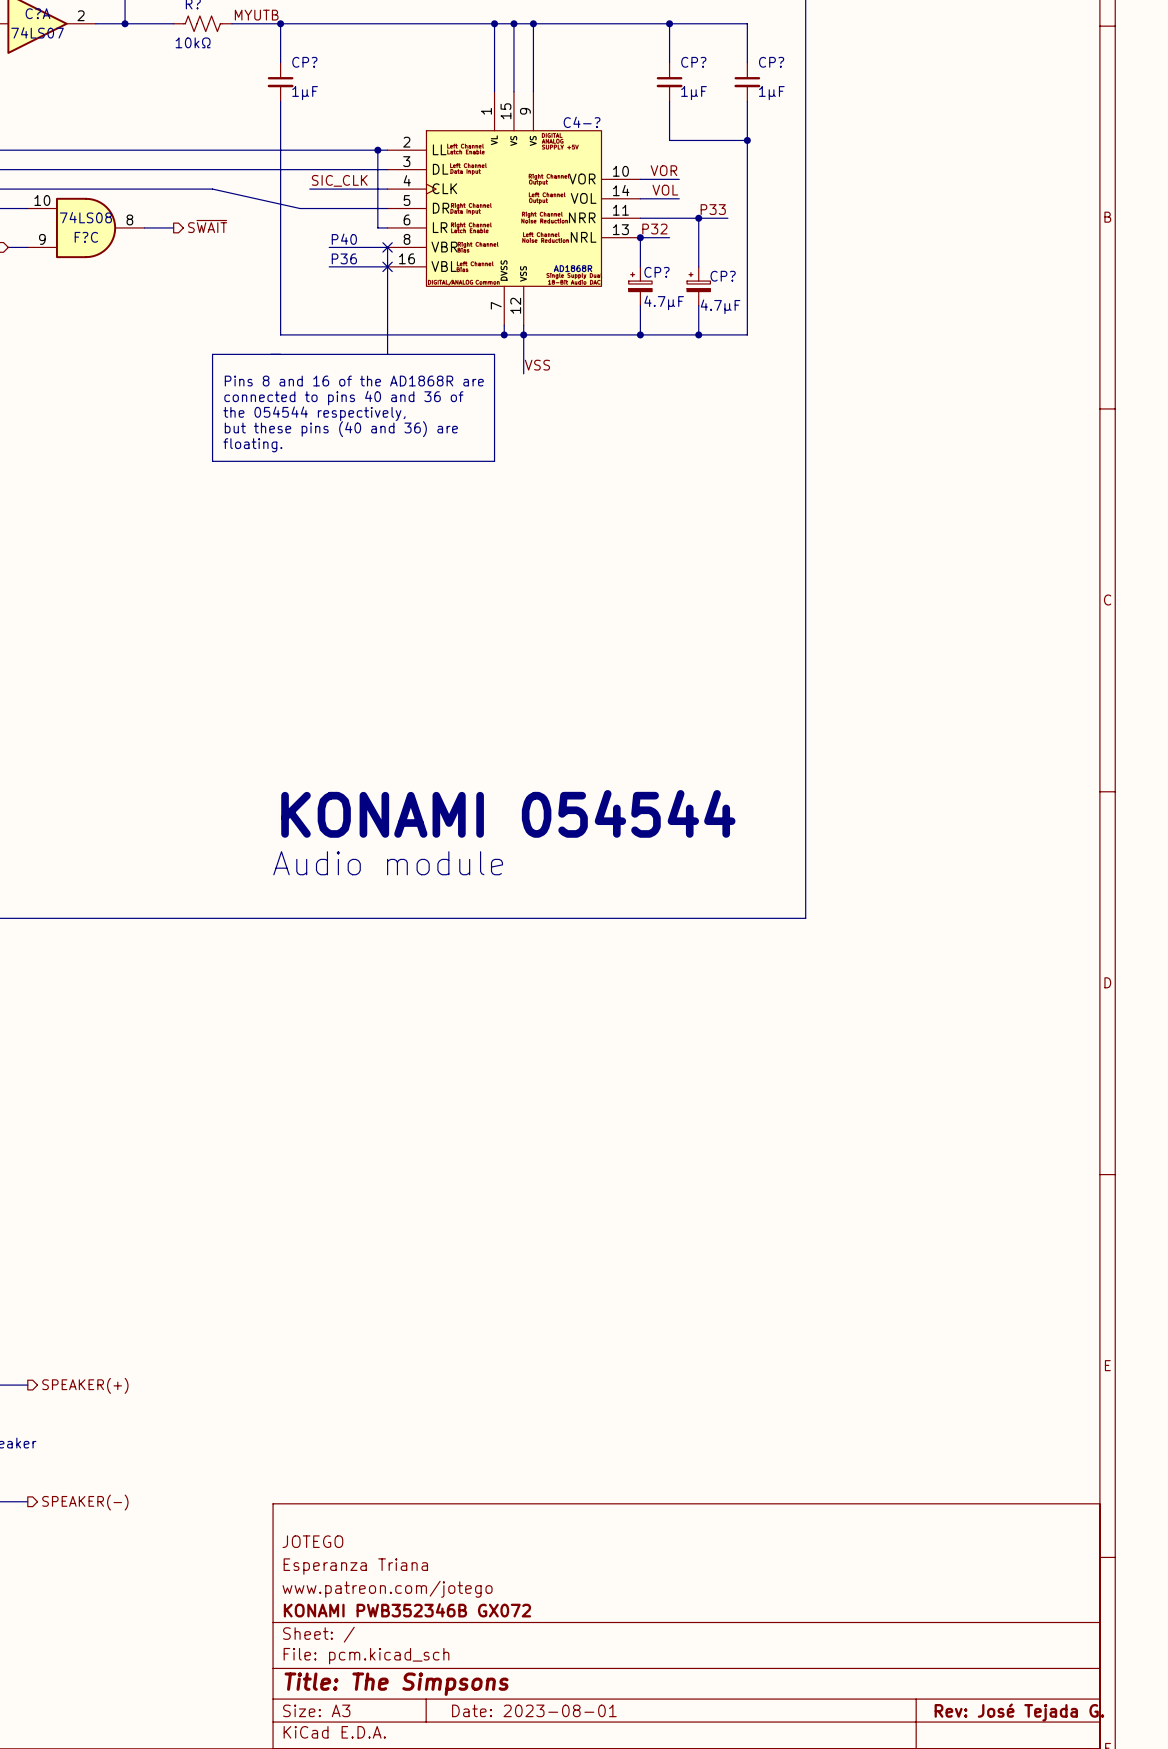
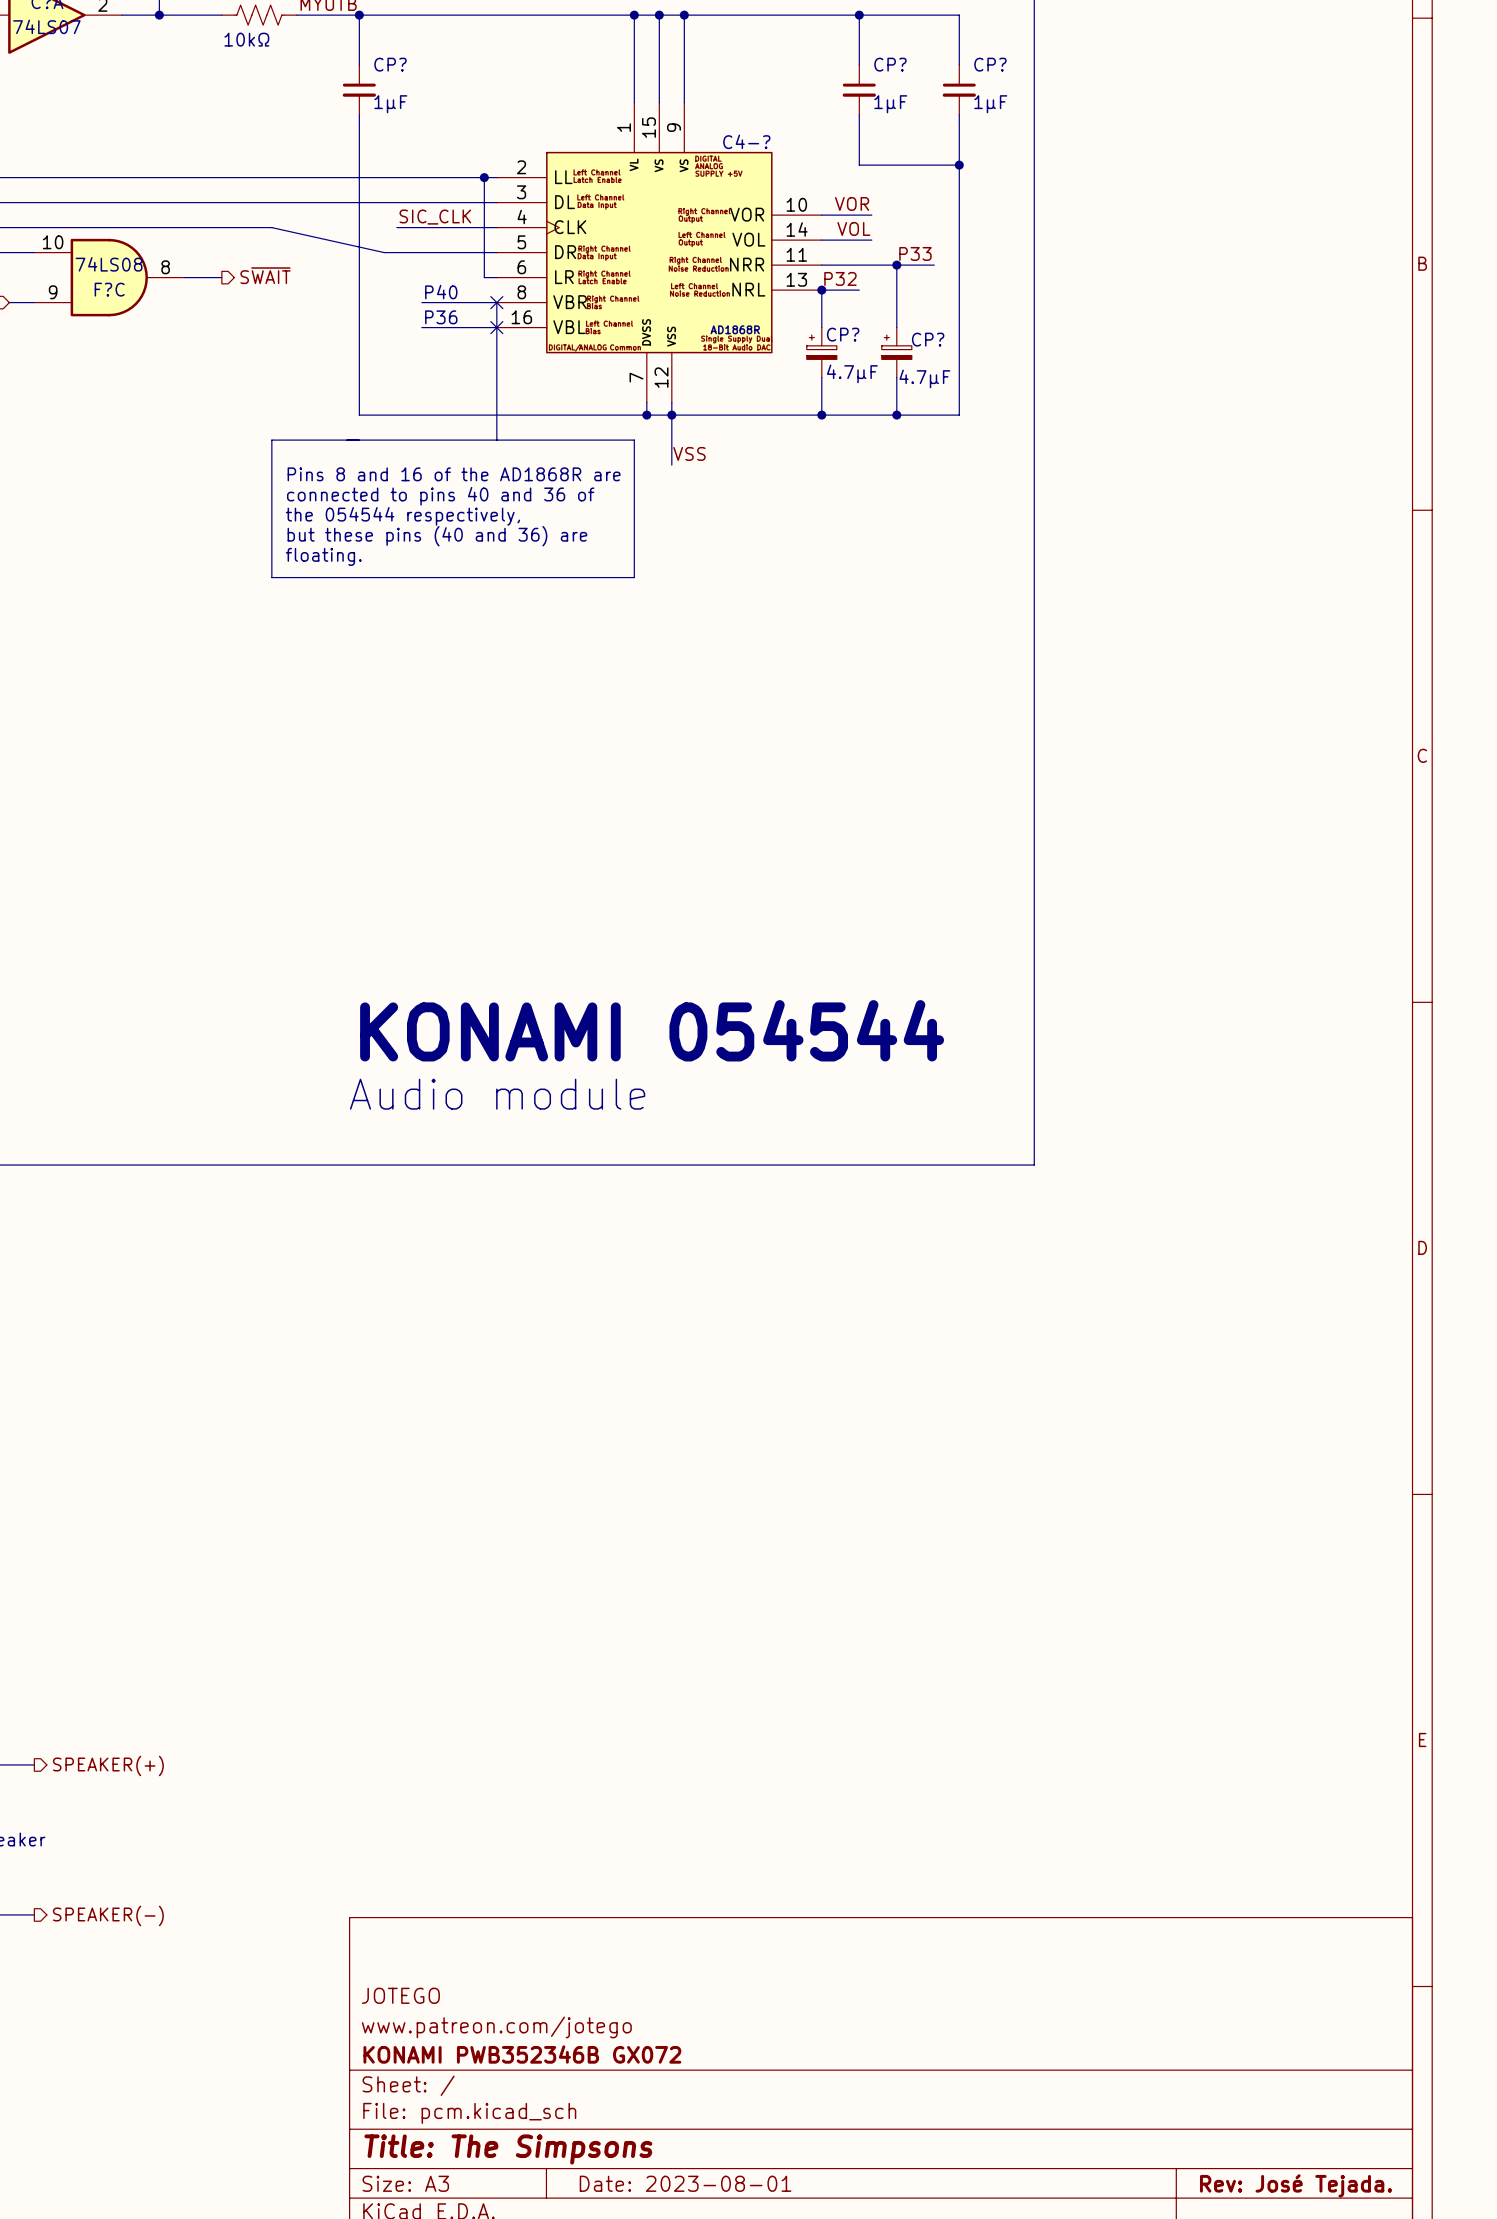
title block: JOTEGO (312, 1541) -> none
title block: Esperanza Triana (355, 1566) -> JOTEGO (400, 1995)
title block: Rev: José Tejada G. (1019, 1712) -> Rev: José Tejada. (1295, 2185)

